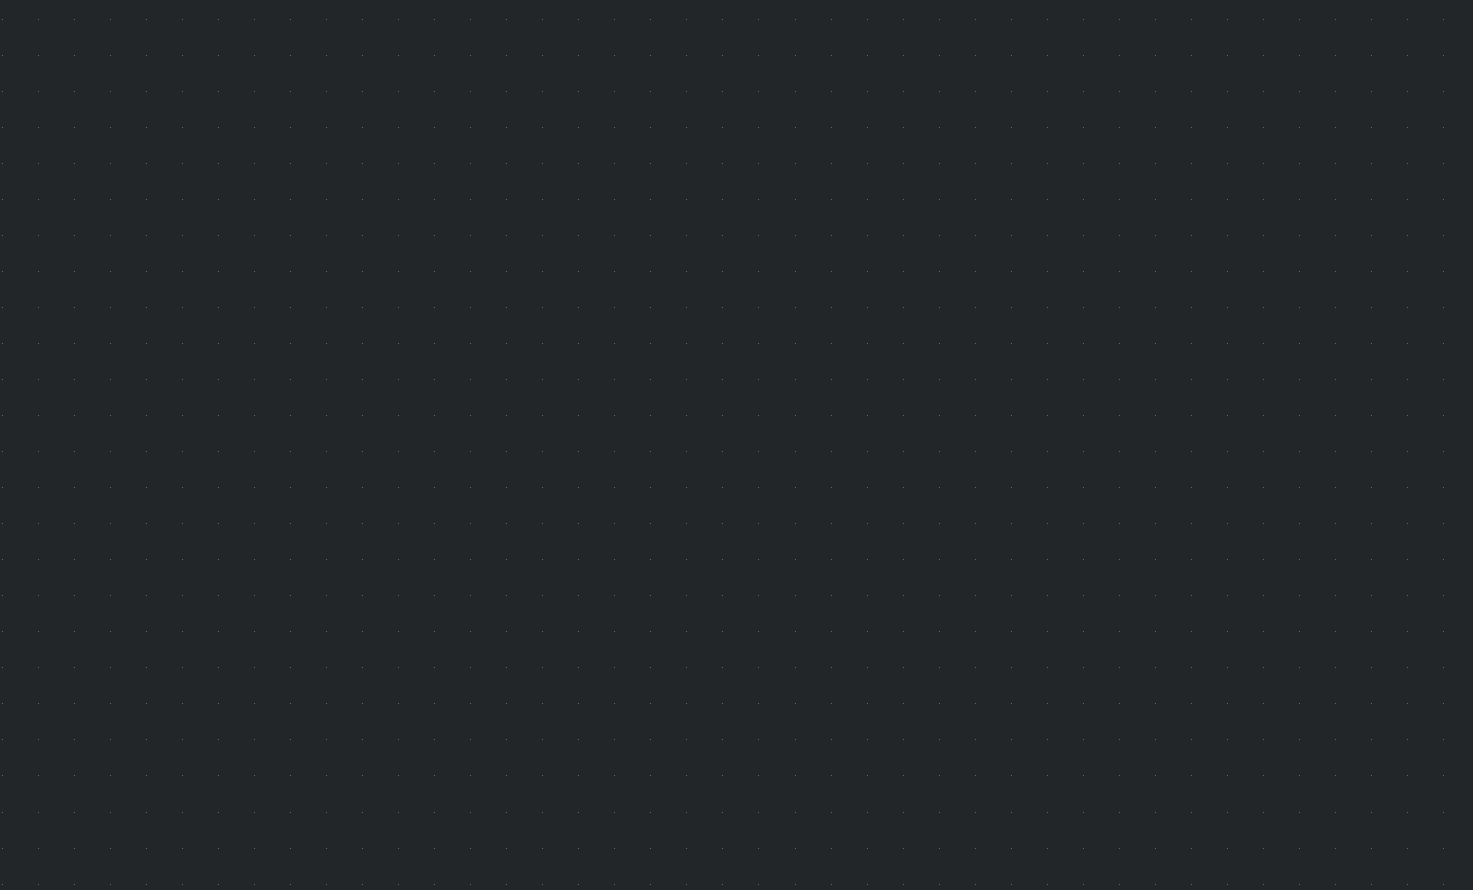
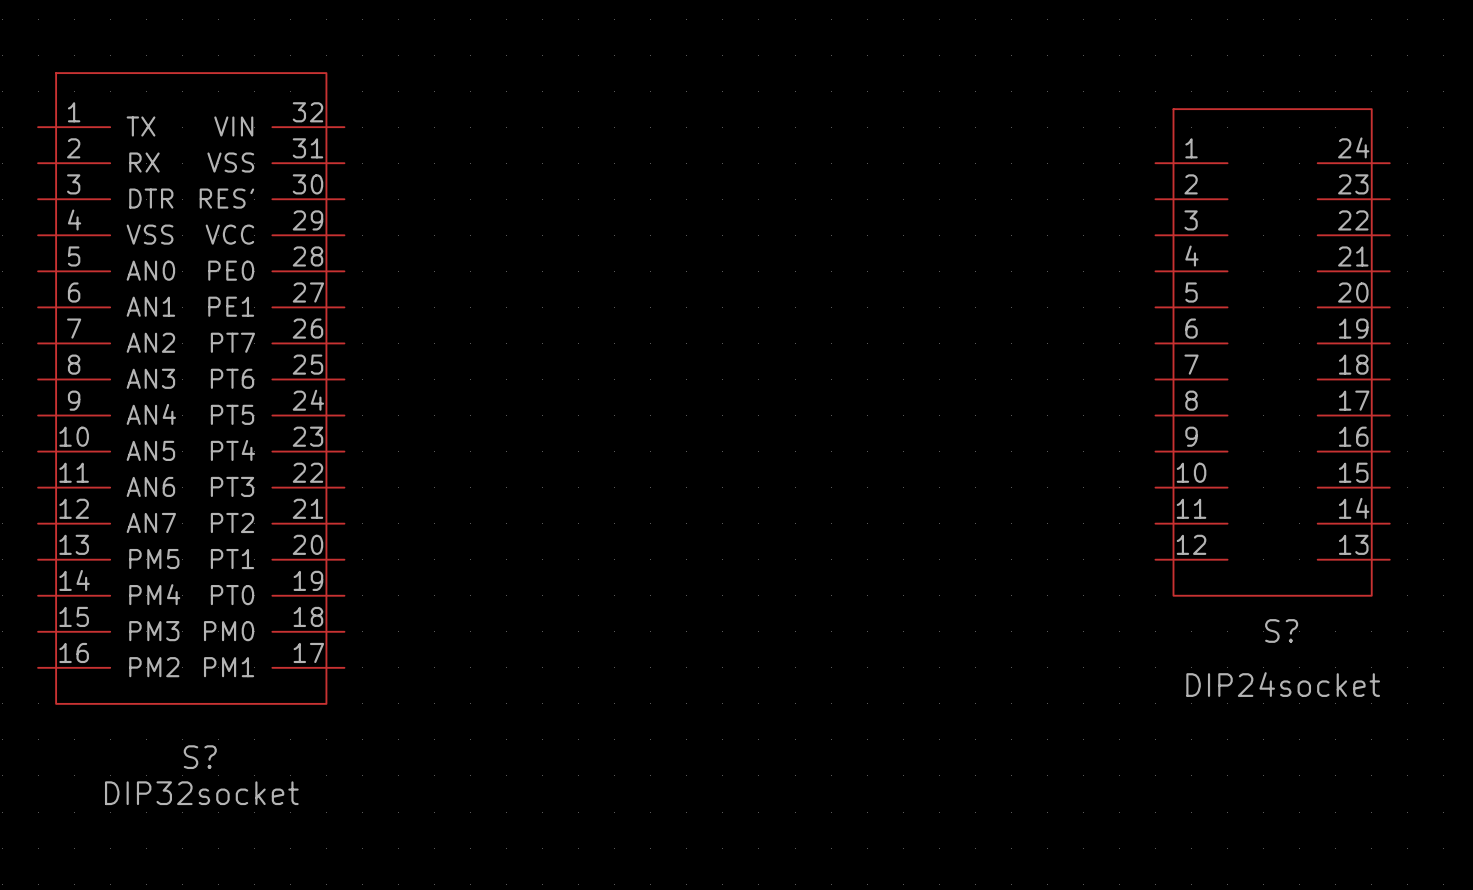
S?: none -> DIP24socket (1272, 352)
S?: none -> DIP32socket (191, 388)

